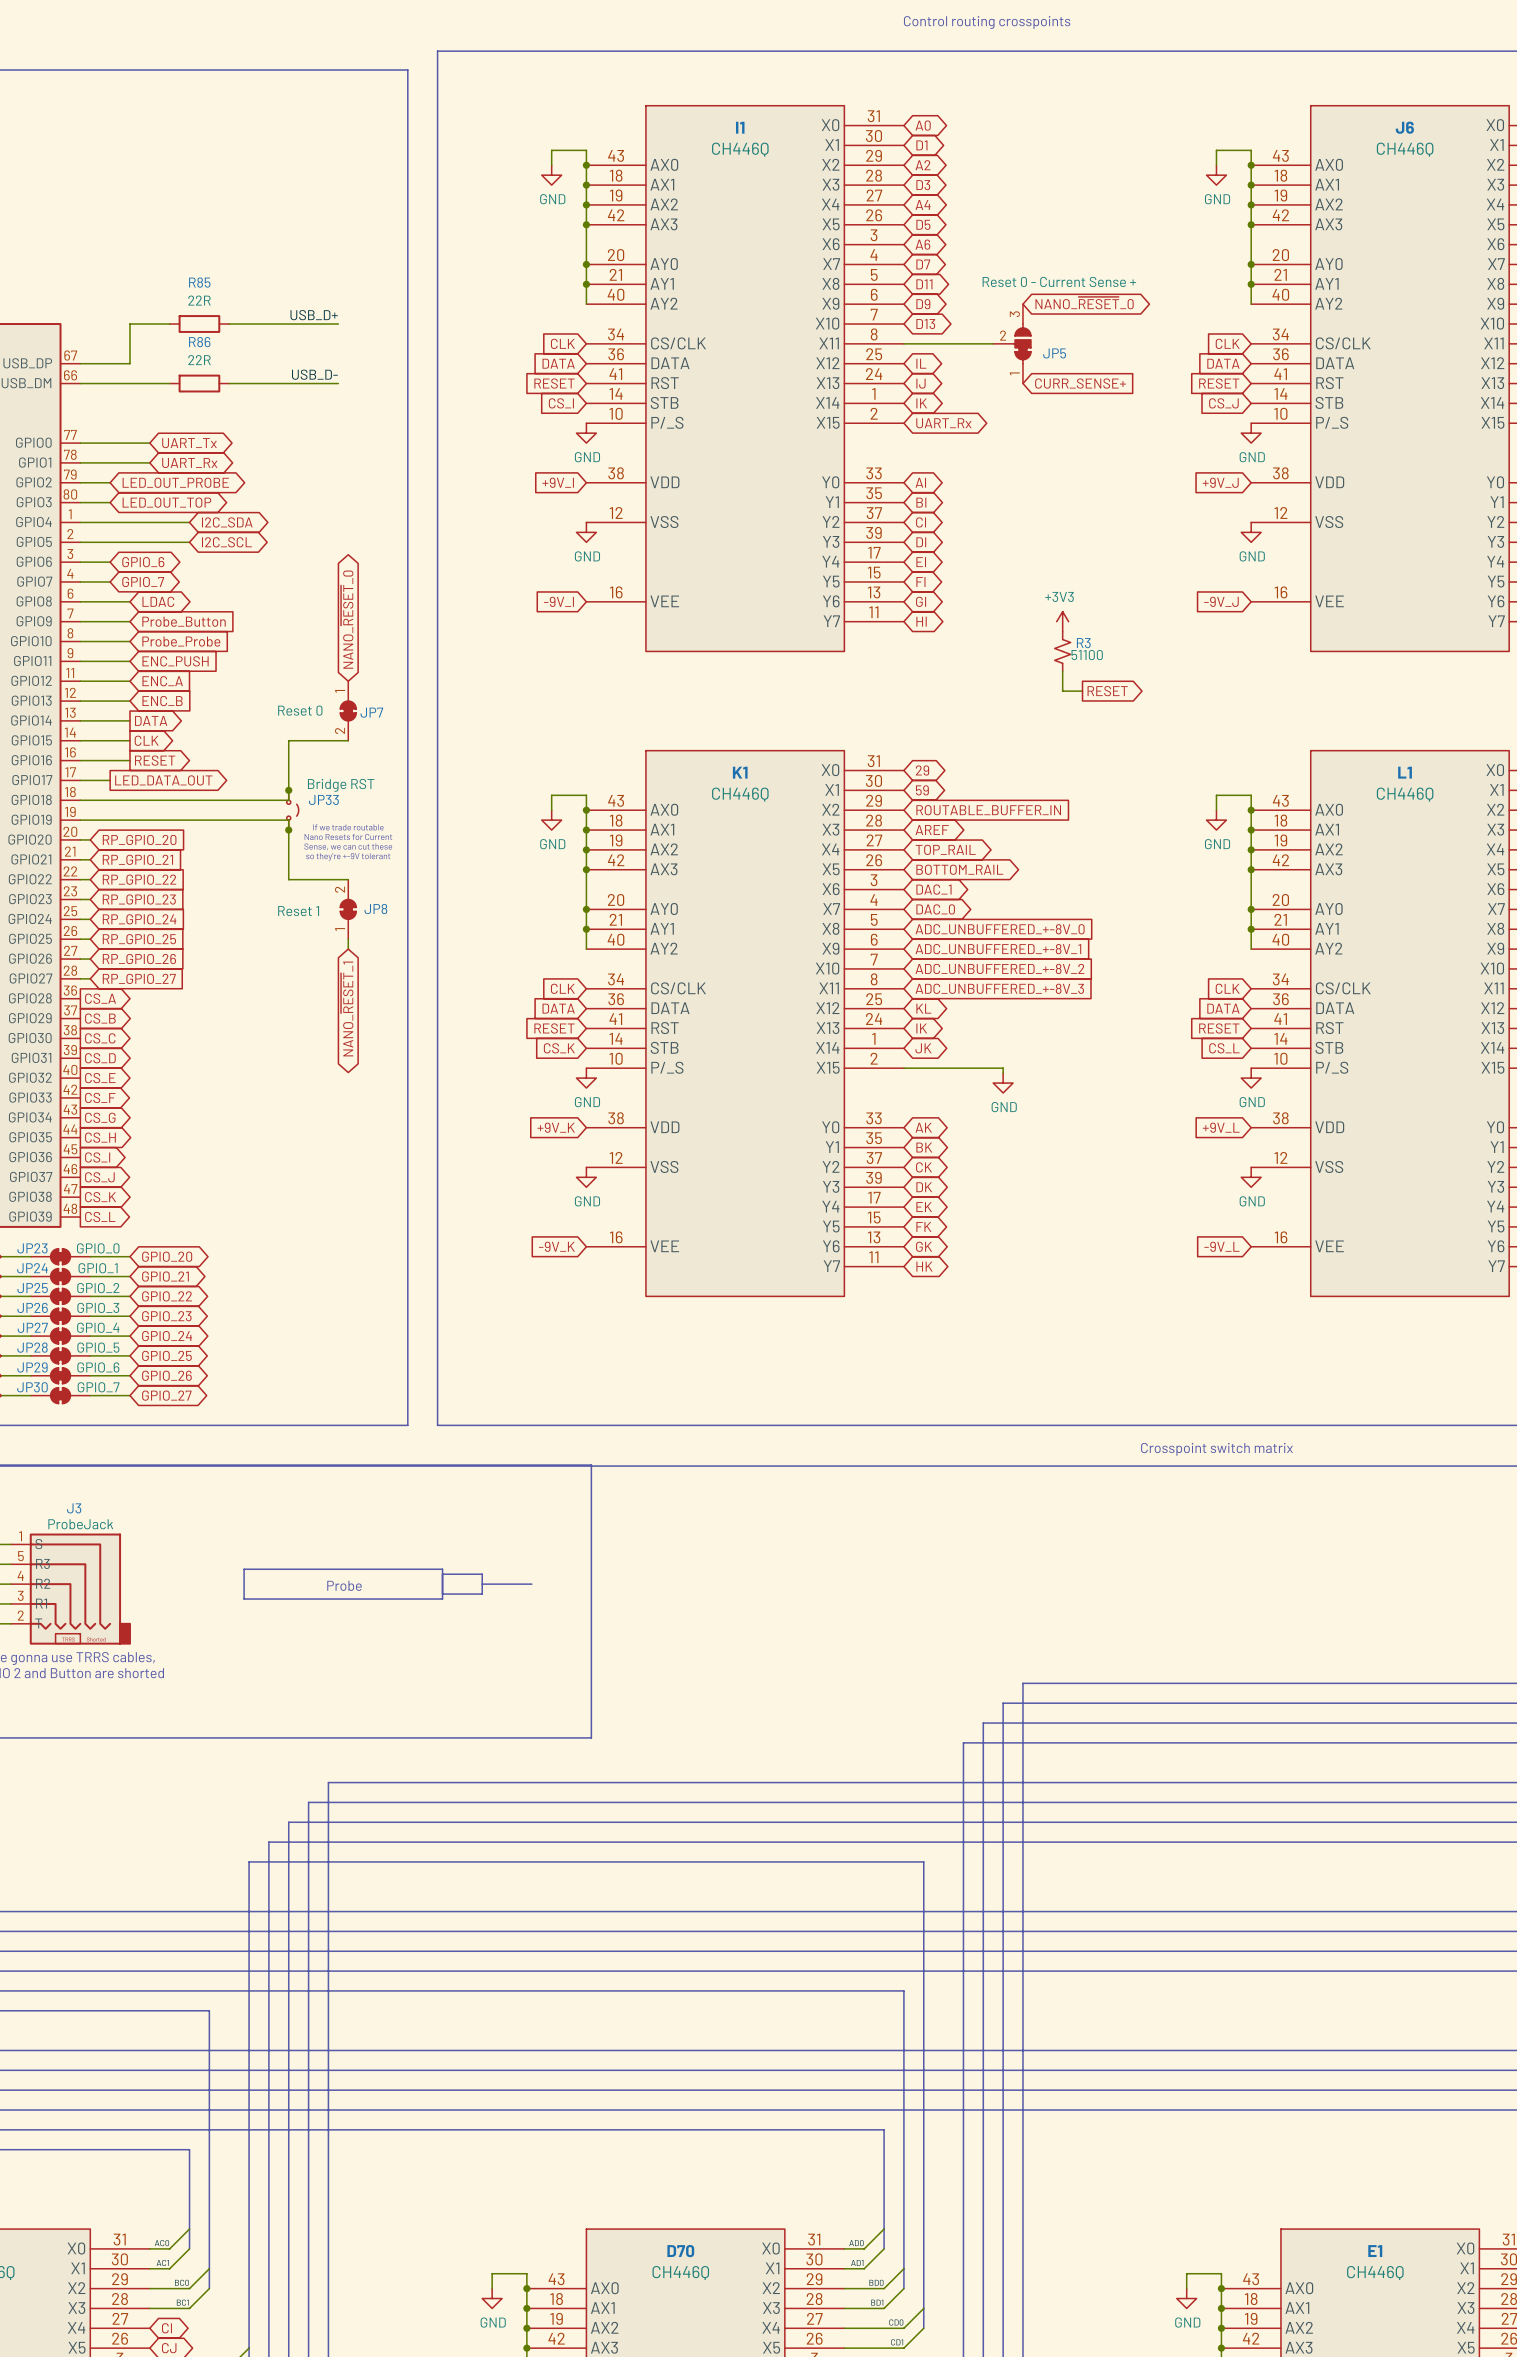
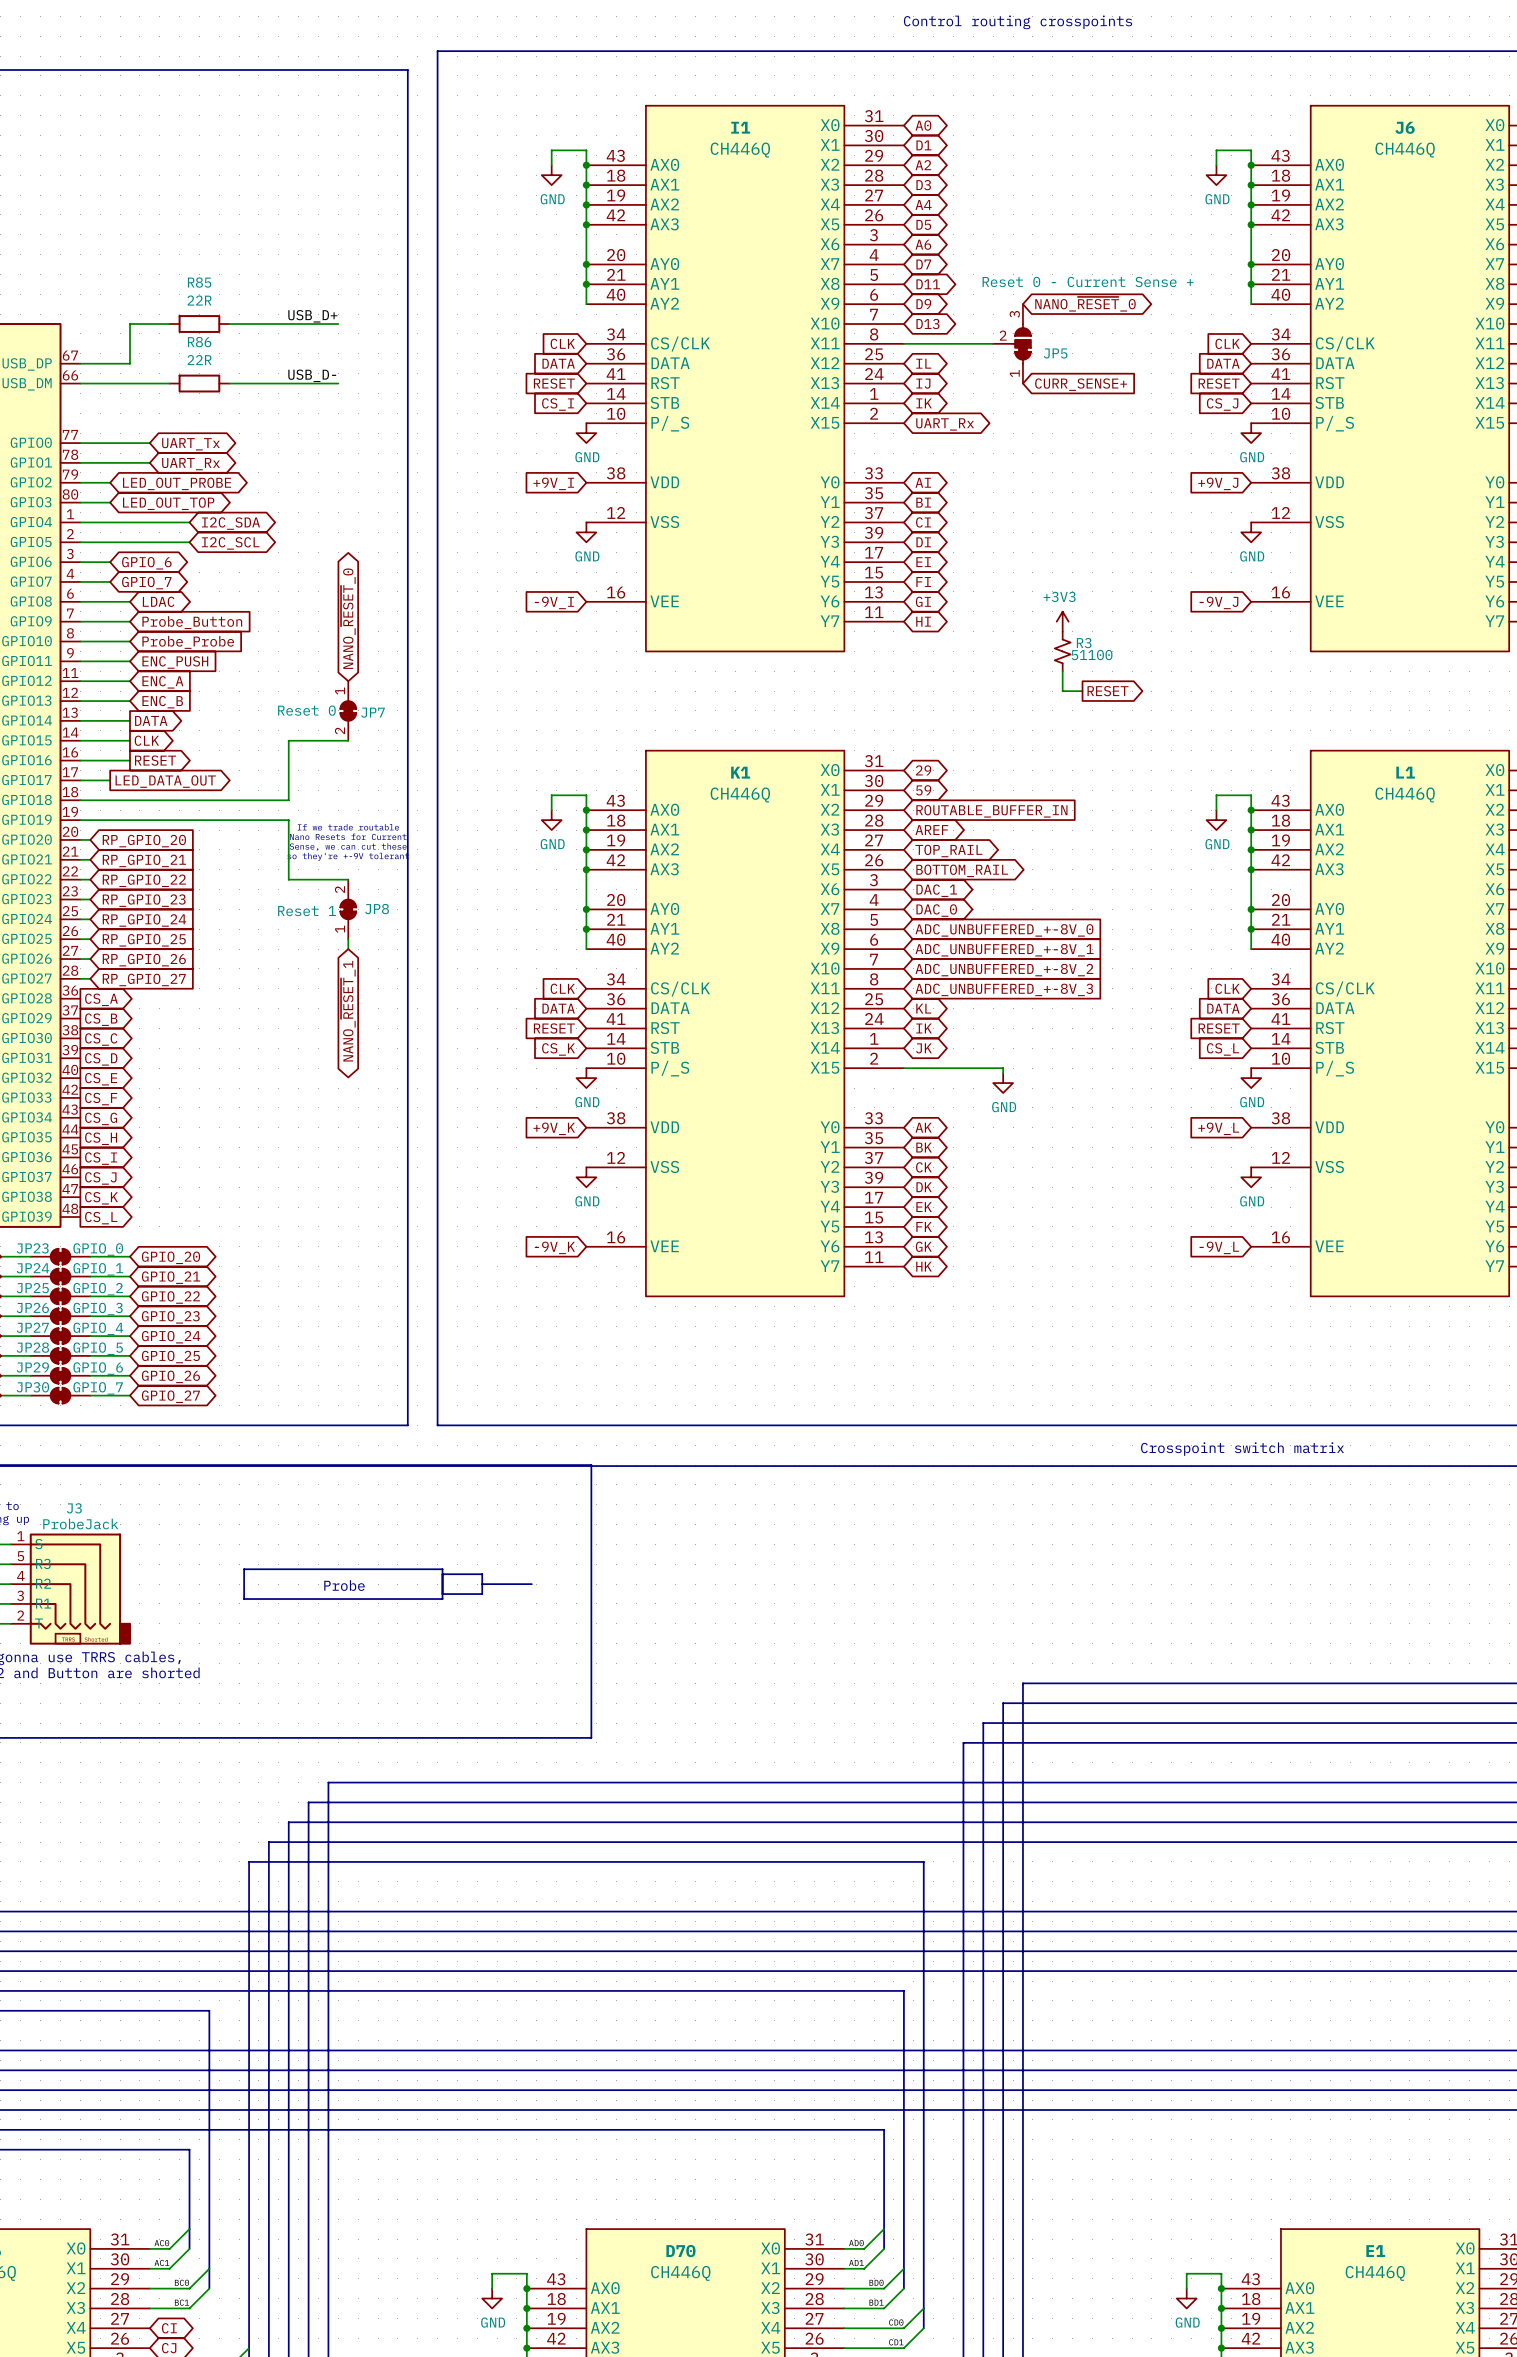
junction: (288, 790) -> none
JP33: Bridge RST (292, 810) -> none
junction: (288, 830) -> none

